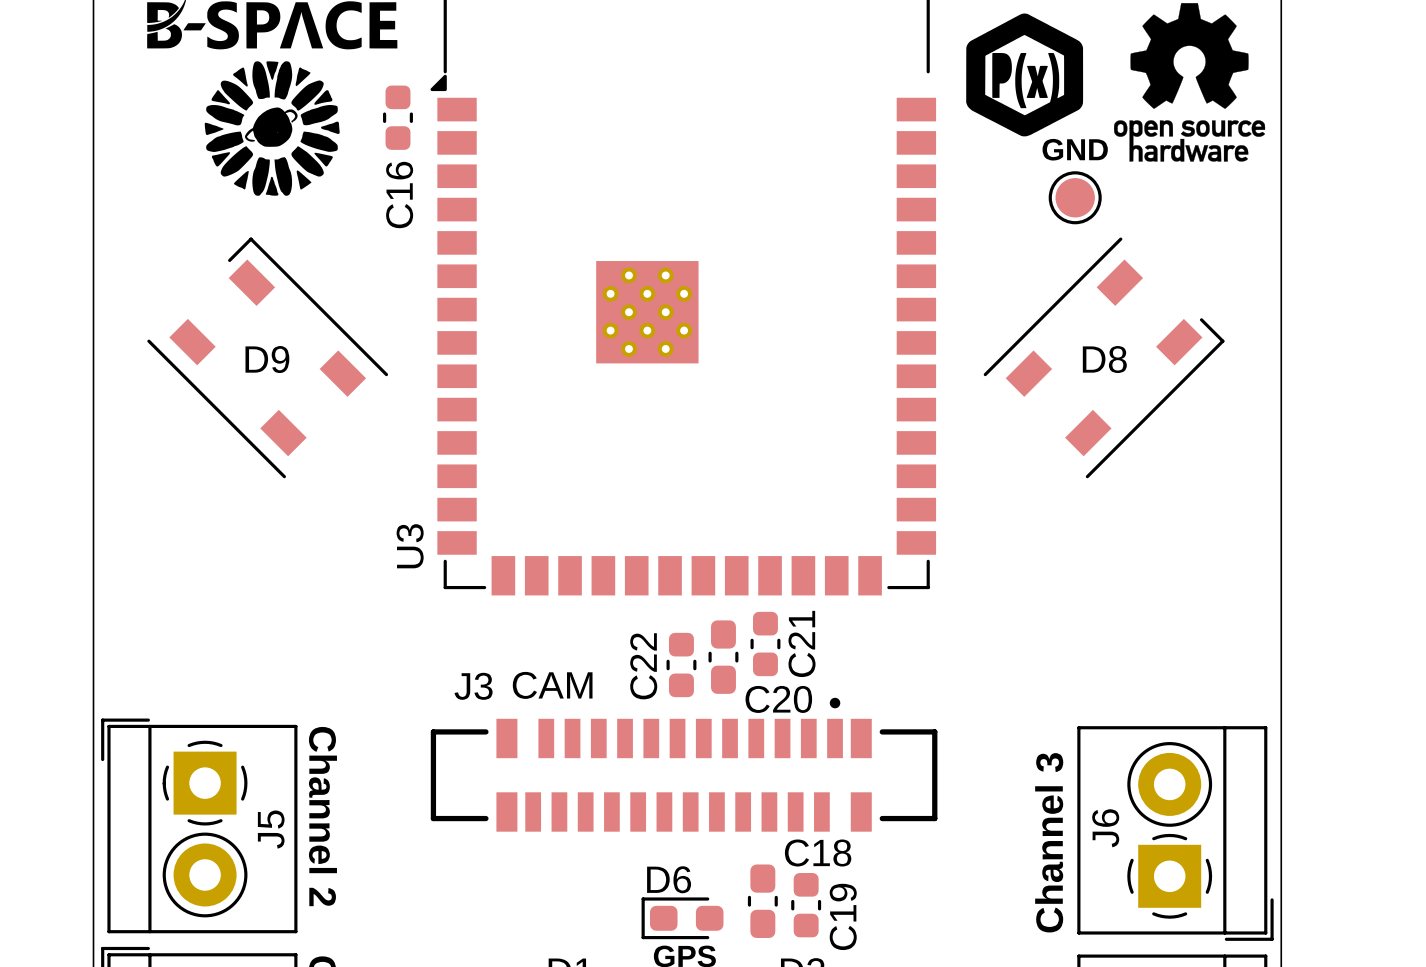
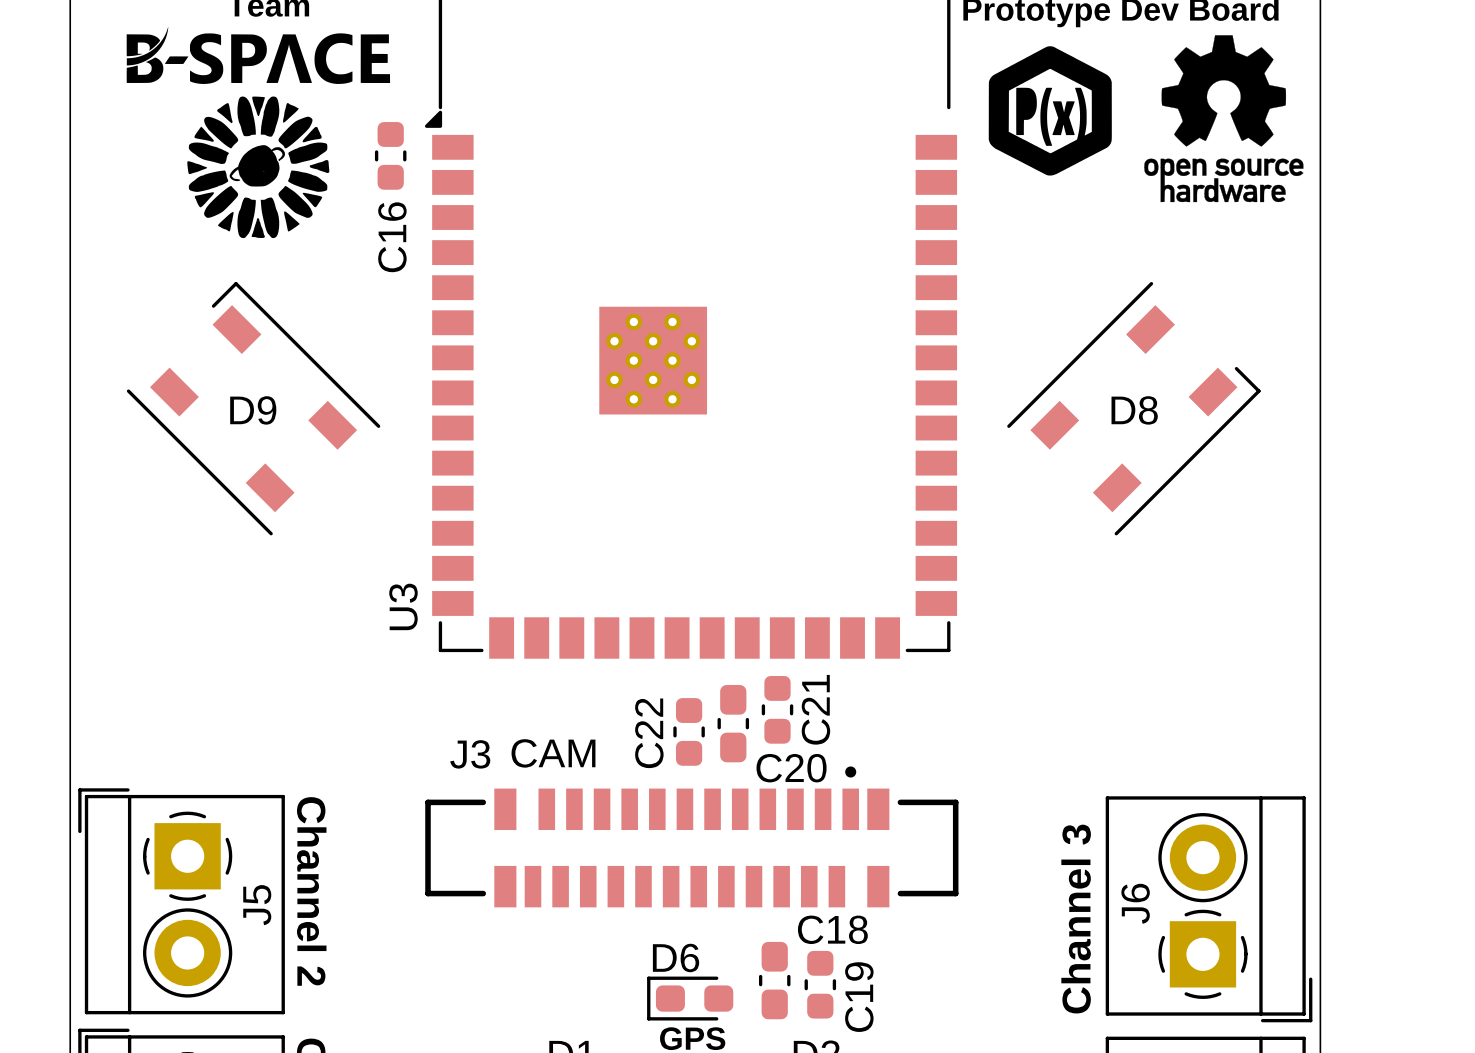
text: GND (1075, 149) -> none
part: (1075, 197) -> none

